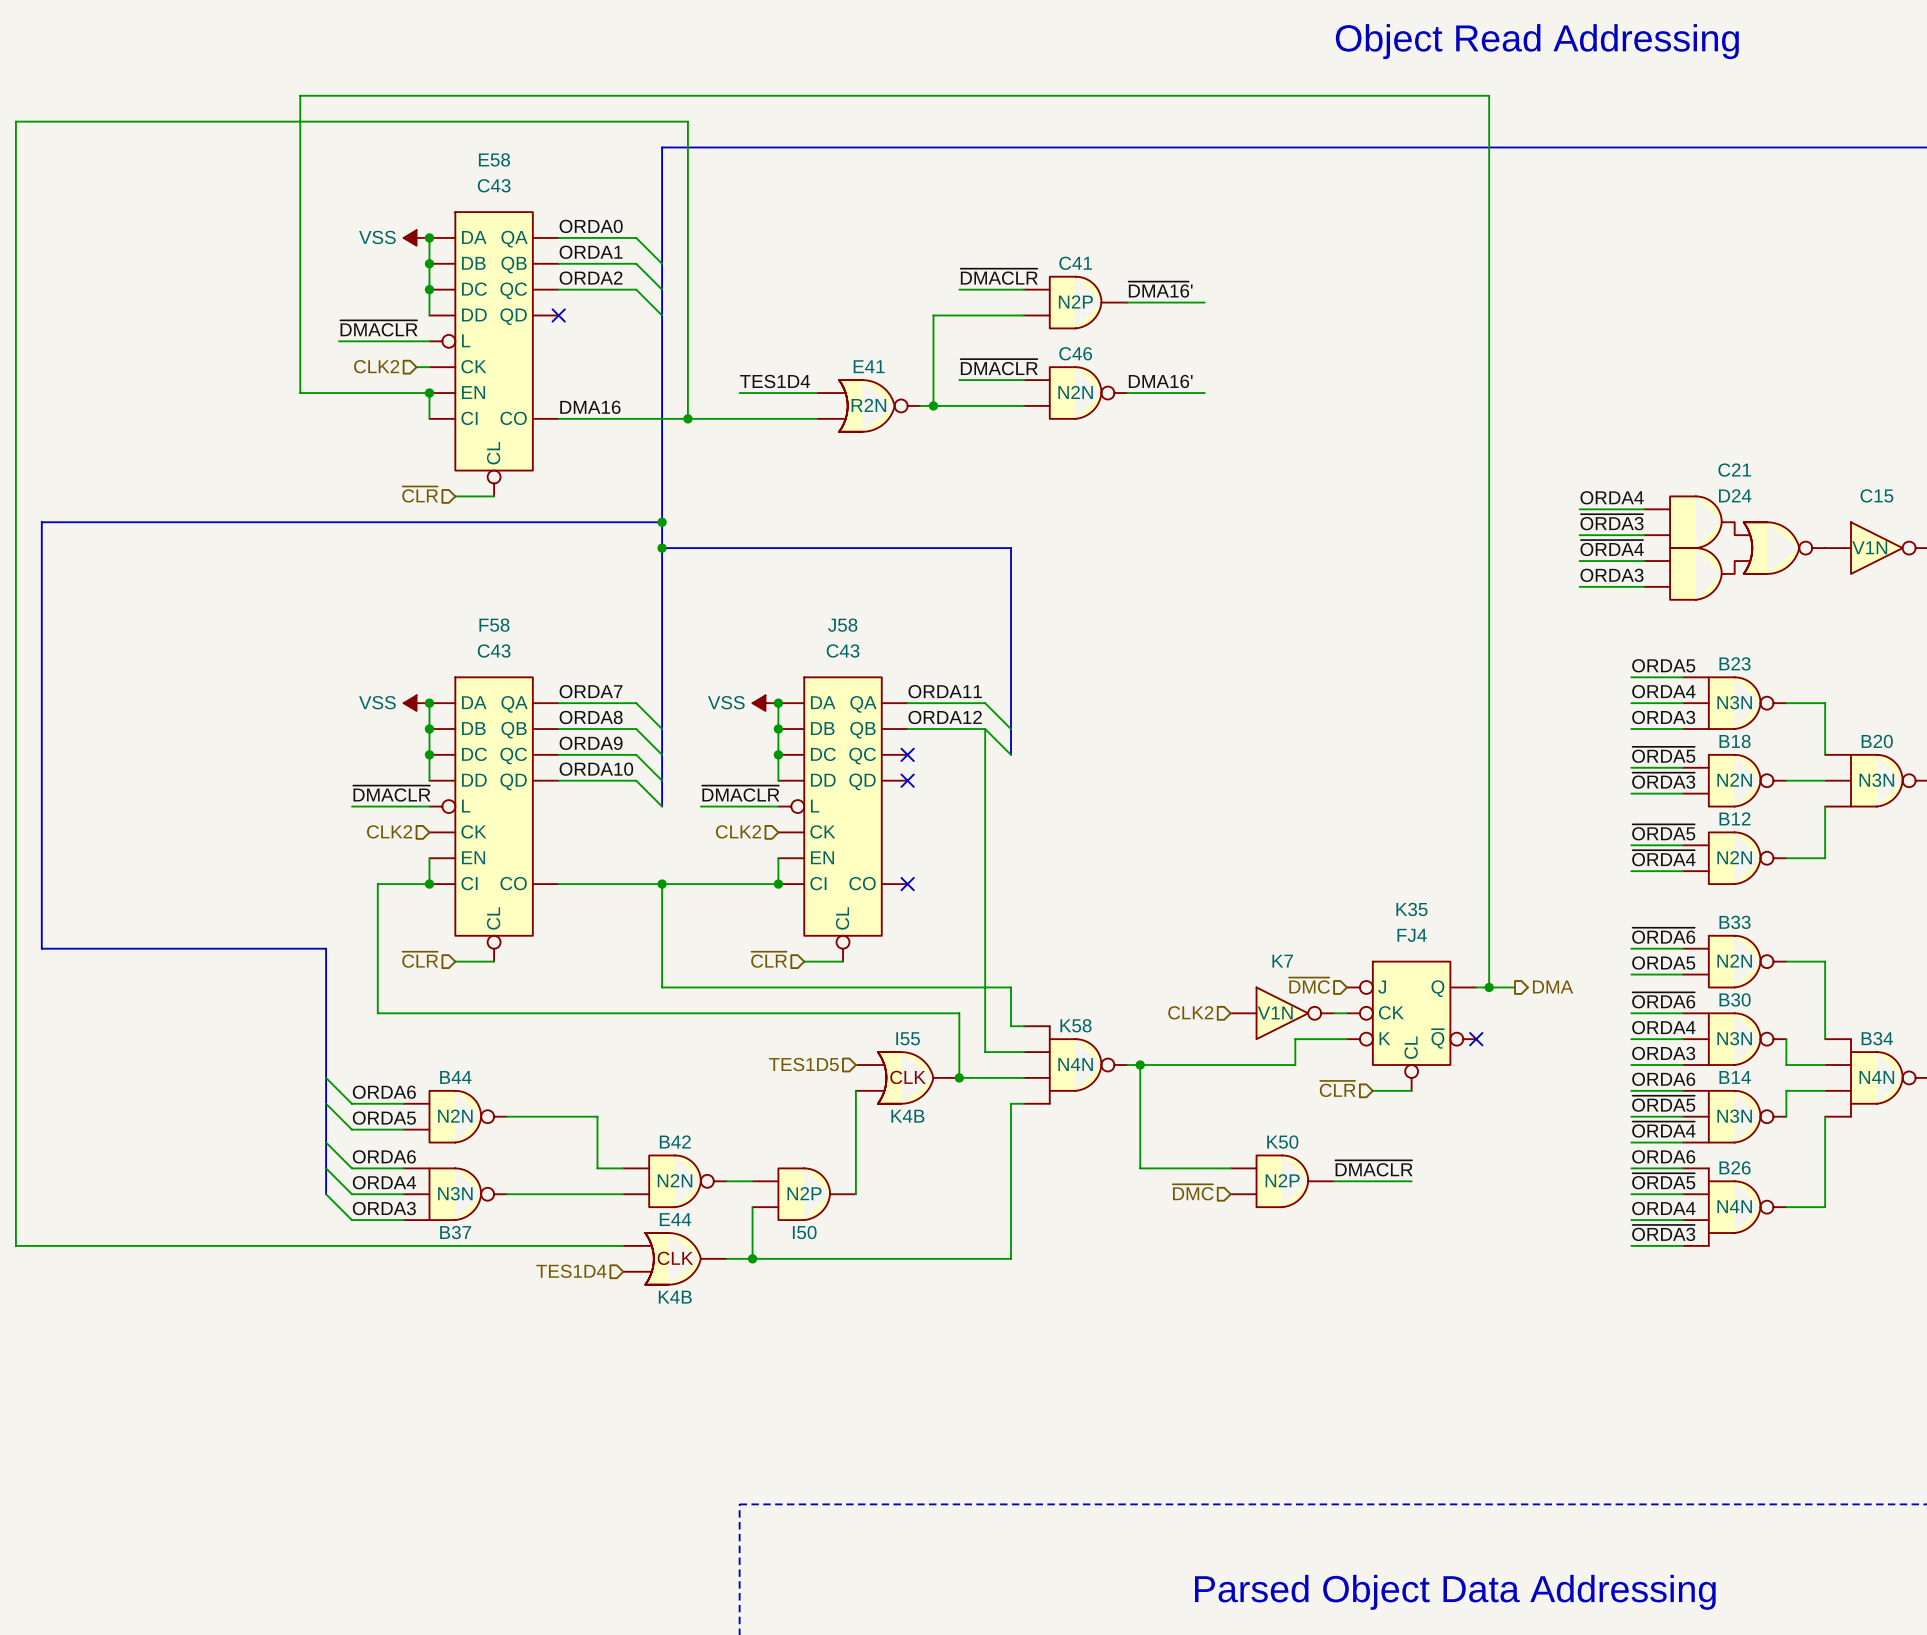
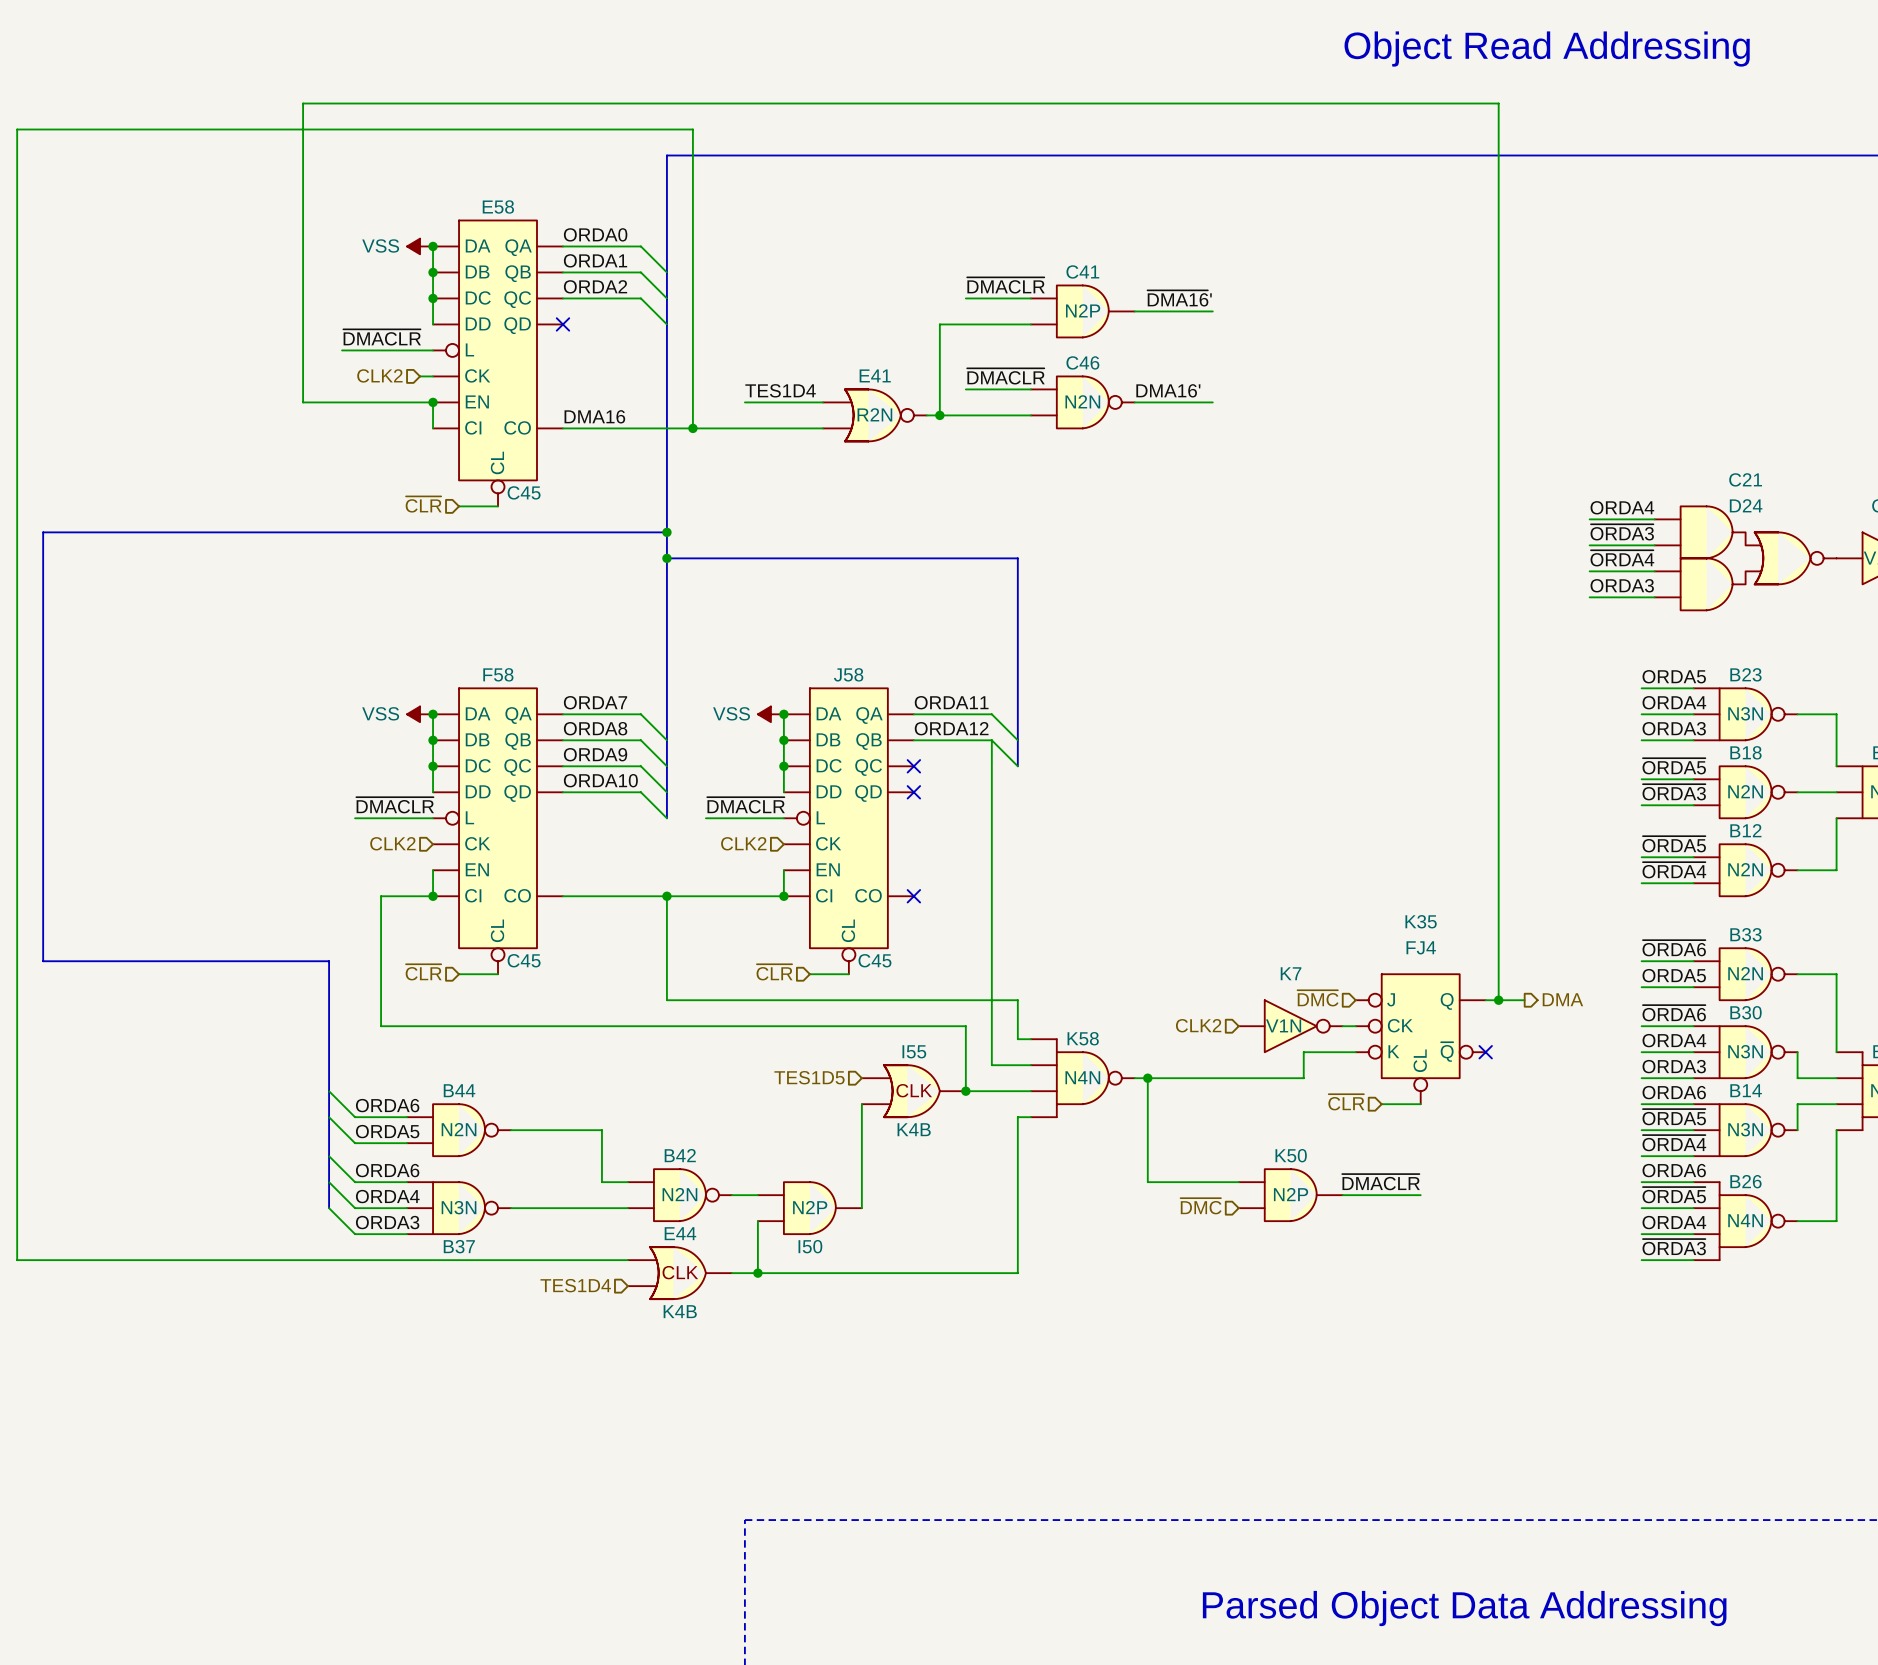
E58 name position: E58 (494, 159) -> E58 (498, 206)
E58 value: C43 (494, 185) -> C45 (524, 492)
label position: ~{DMA16}' (1160, 289) -> ~{DMA16}' (1179, 298)
F58 name position: F58 (494, 625) -> F58 (498, 674)
J58 name position: J58 (842, 625) -> J58 (848, 674)
F58 value: C43 (494, 650) -> C45 (524, 960)
J58 value: C43 (843, 650) -> C45 (874, 960)
label position: ~{DMACLR} (1373, 1168) -> ~{DMACLR} (1381, 1182)

